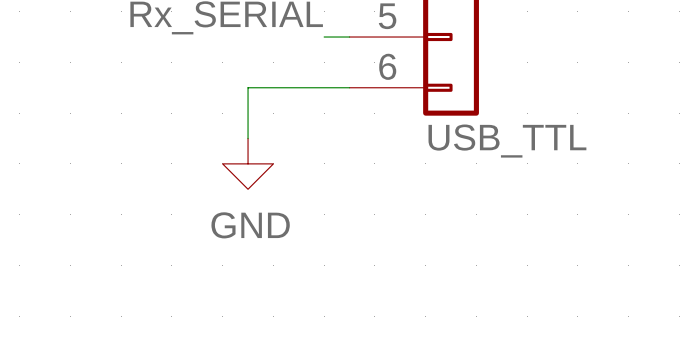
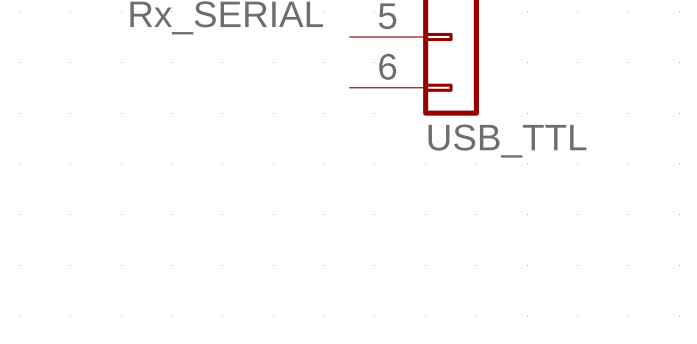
wire: (324, 37) (349, 37) -> none
wire: (349, 87) (248, 87) (248, 138) -> none
power symbol: GND (248, 163) -> none

